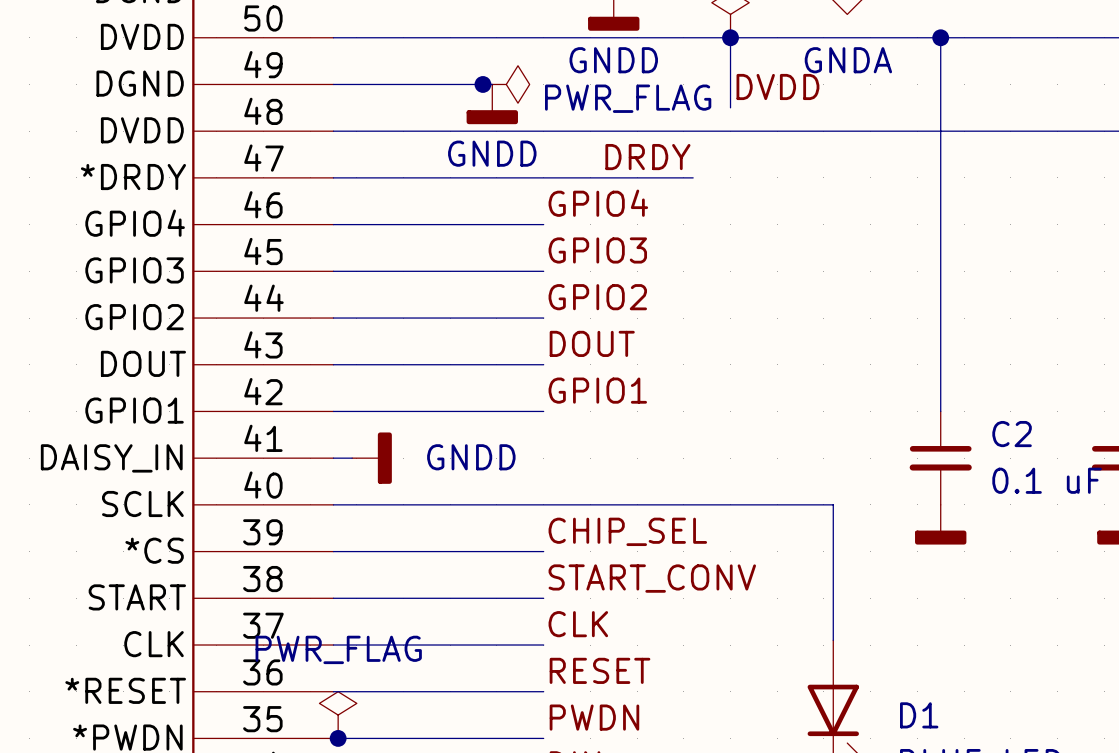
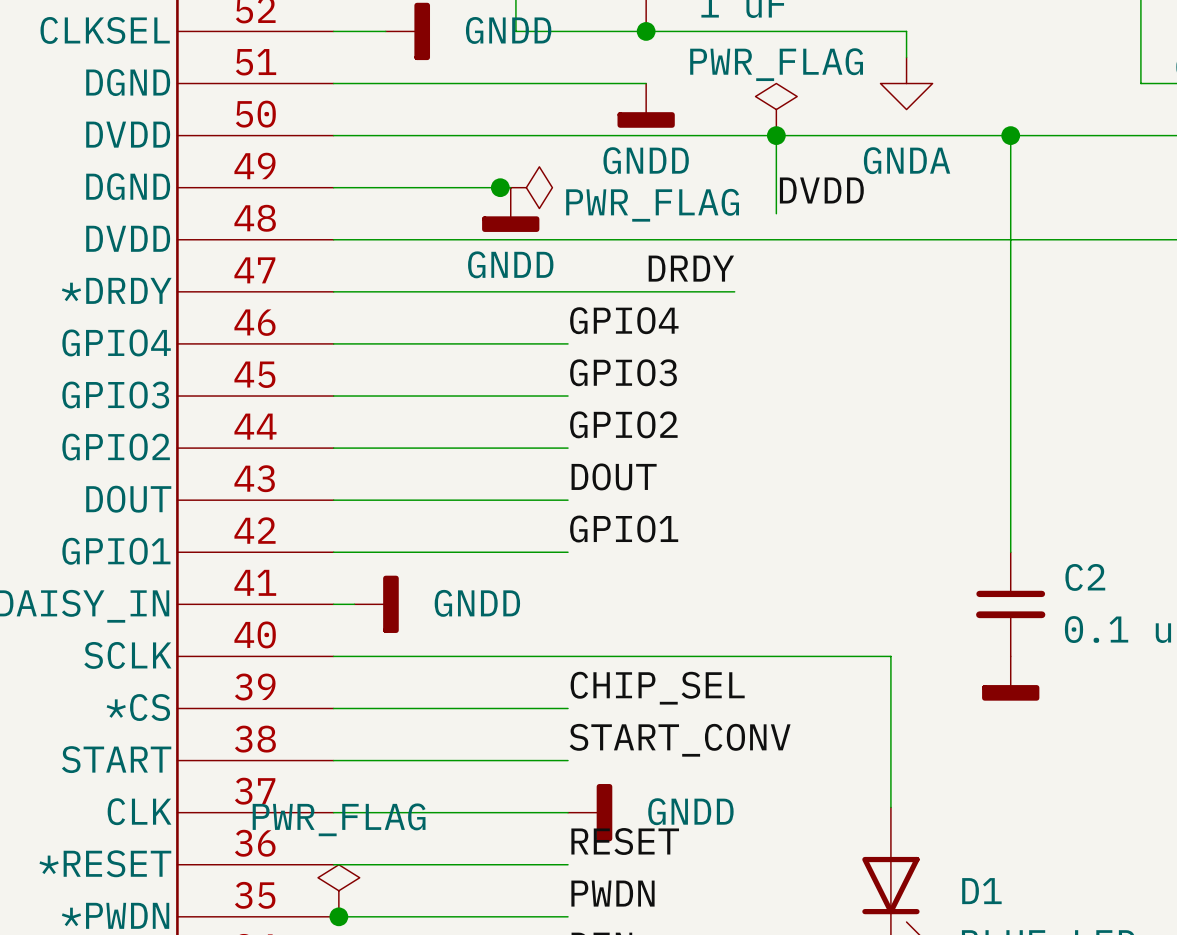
label: CLK (578, 624) -> none
power symbol: none -> GNDD (590, 812)

